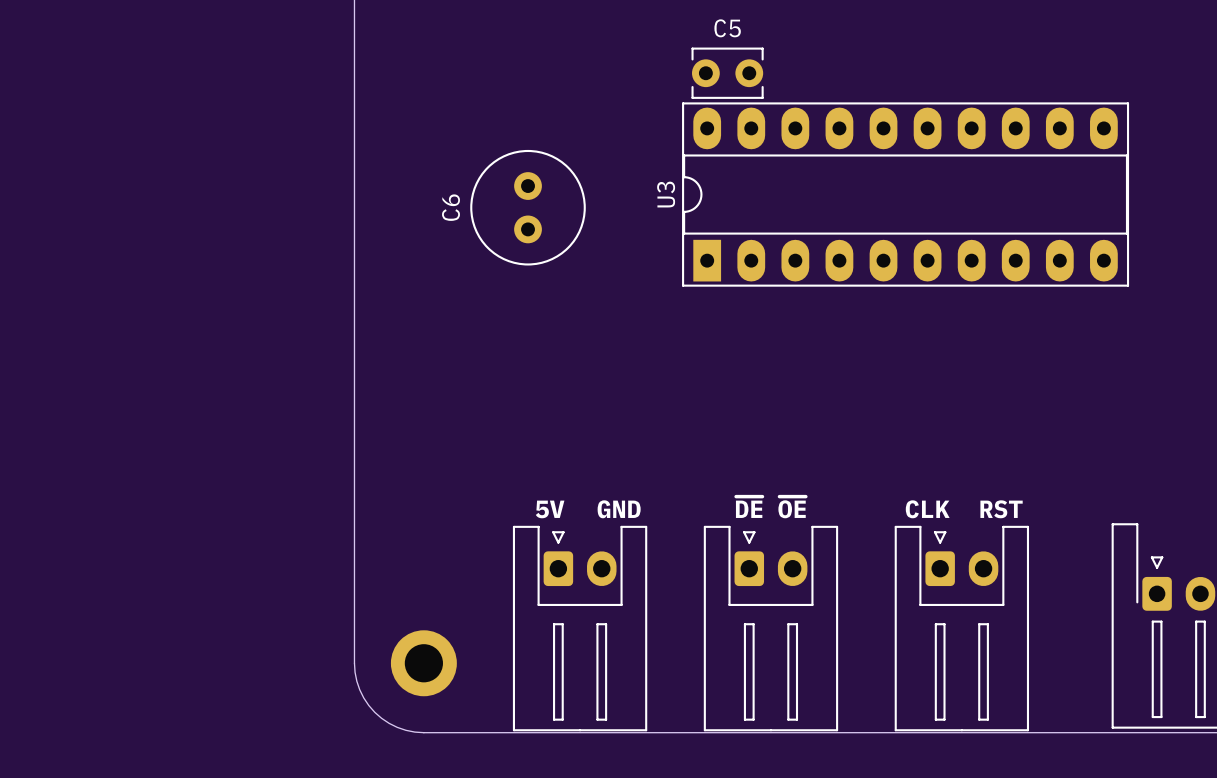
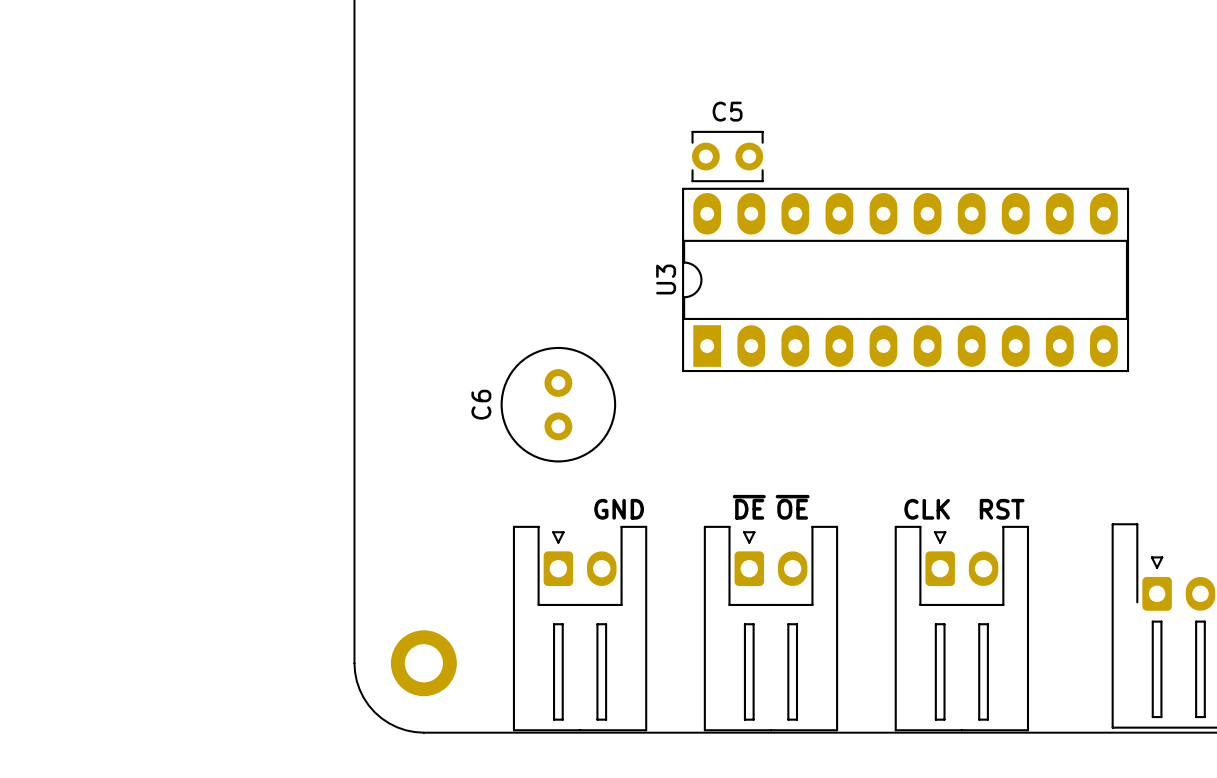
C5 position: (727, 73) -> (727, 156)
U3 position: (905, 194) -> (905, 279)
C6 position: (528, 207) -> (558, 404)
text: 5V (550, 509) -> none

